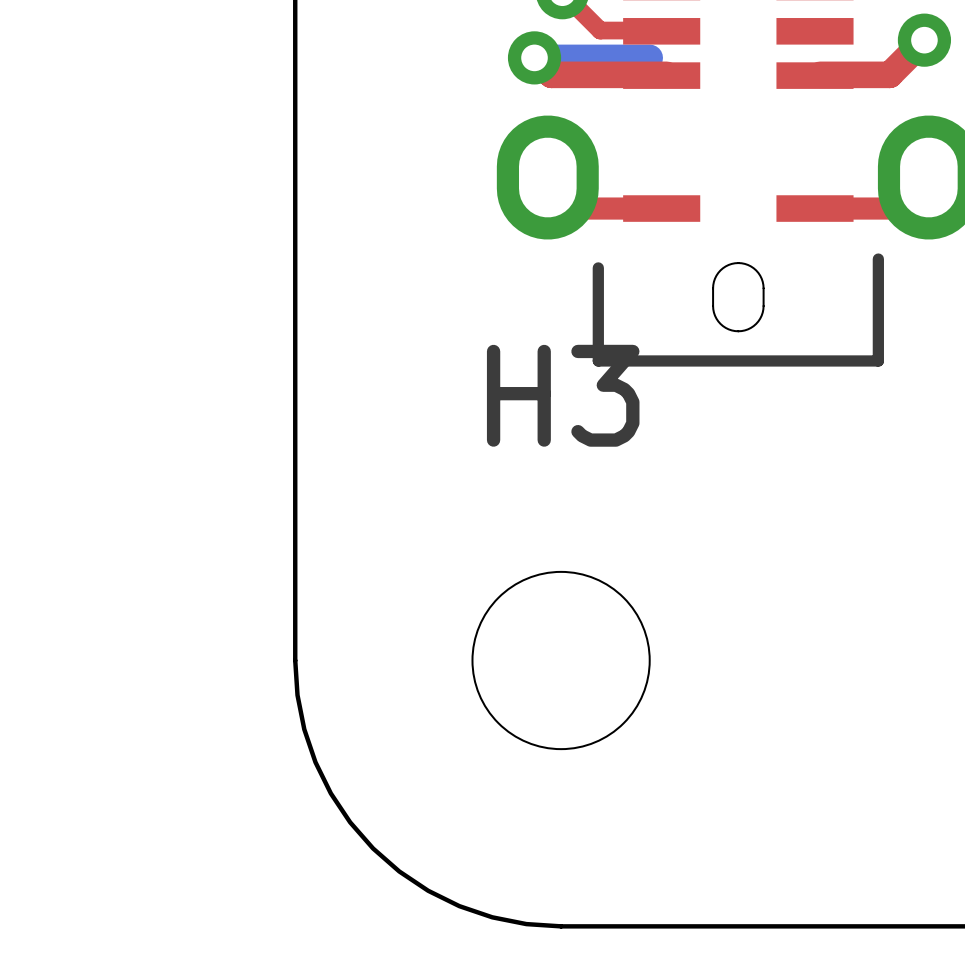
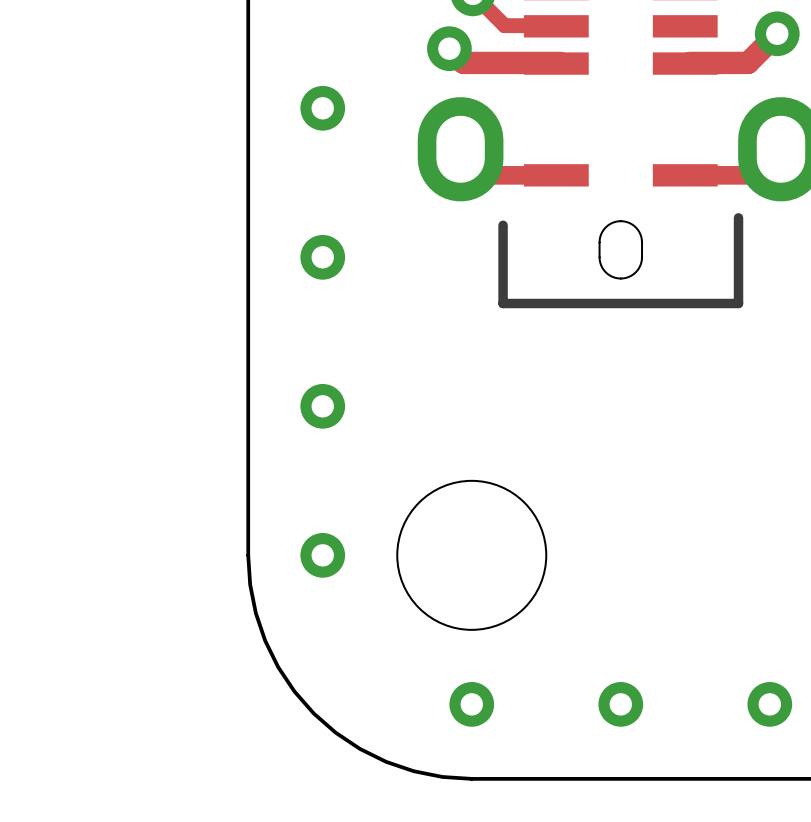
bottom track: (534, 57) (649, 57) -> none
via: none -> (322, 108)
via: none -> (322, 257)
H3 name: H3 (563, 395) -> none
via: none -> (322, 406)
via: none -> (322, 555)
via: none -> (471, 704)
via: none -> (620, 704)
via: none -> (769, 704)

